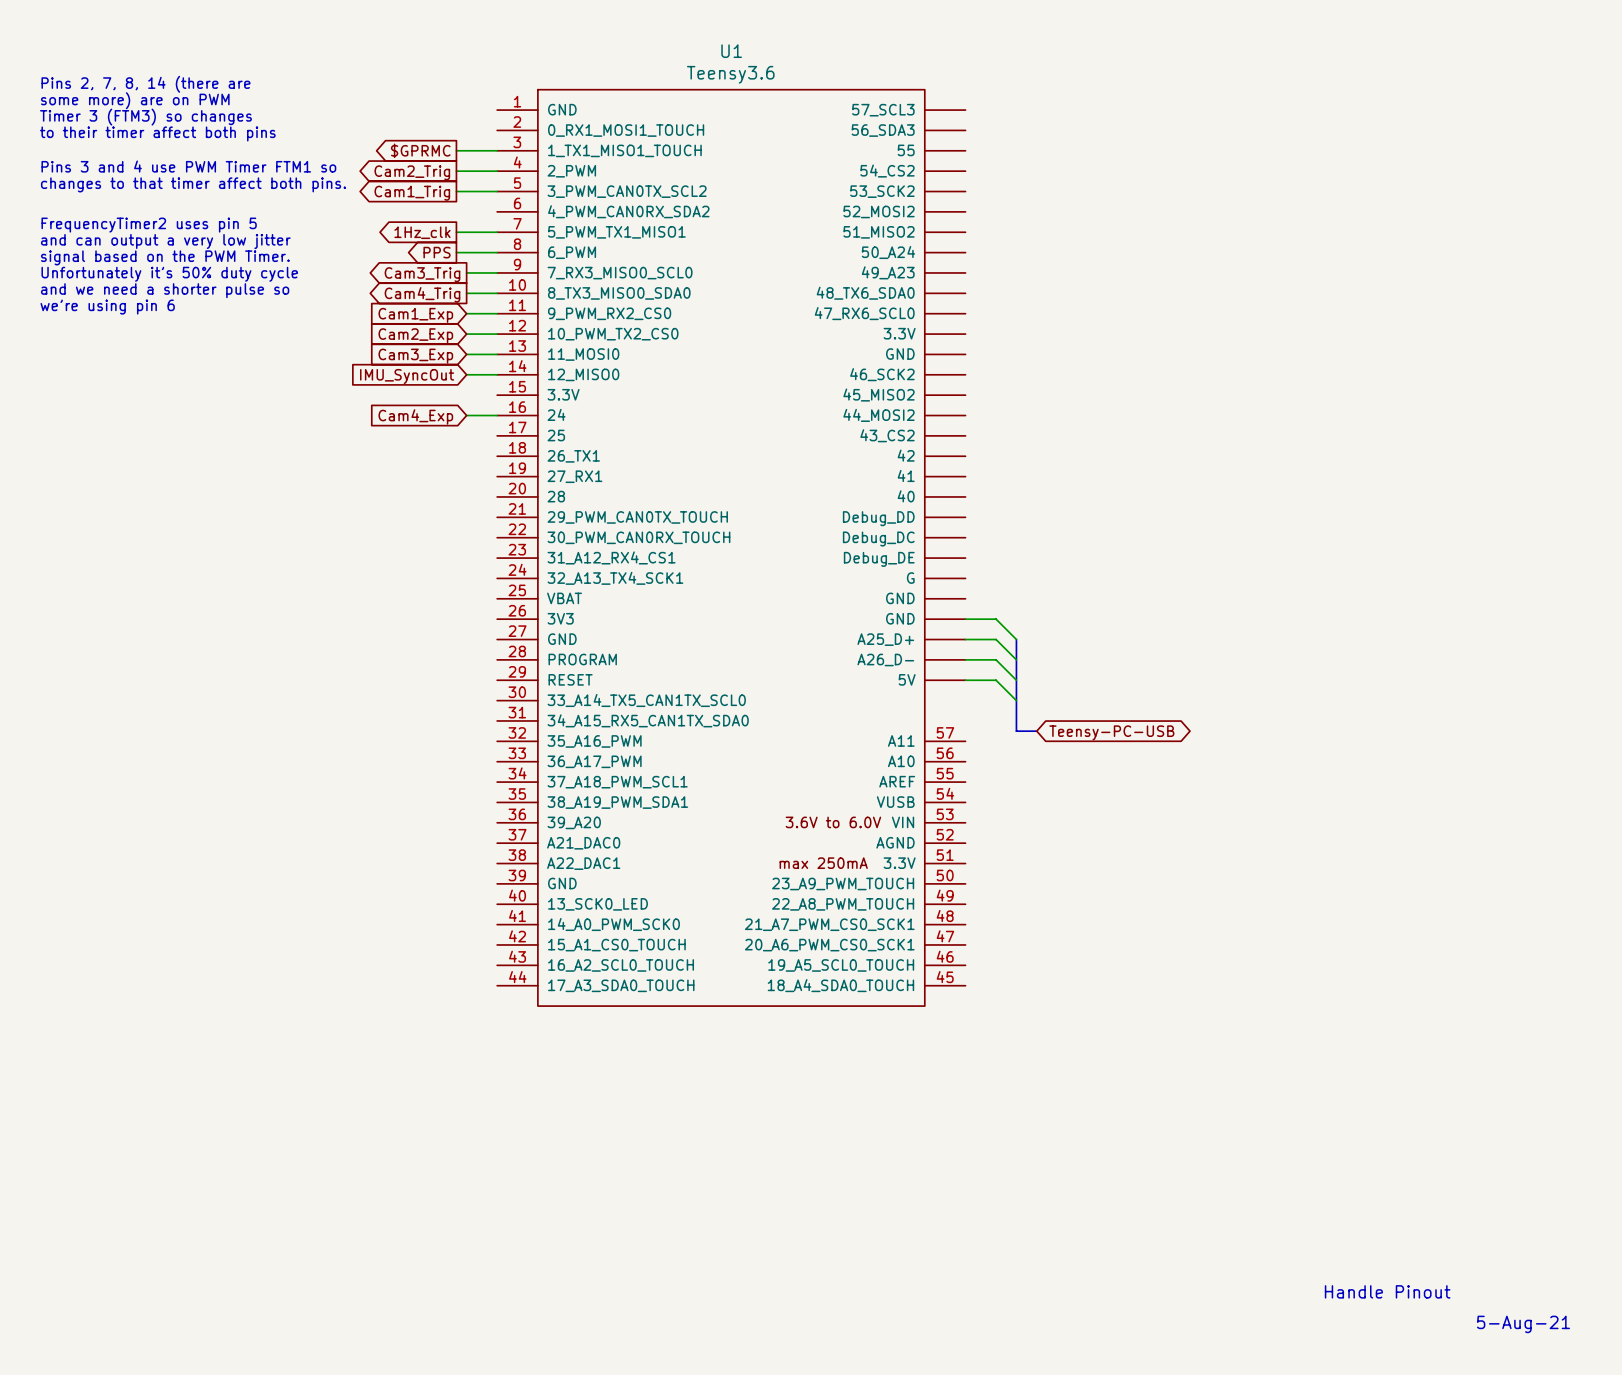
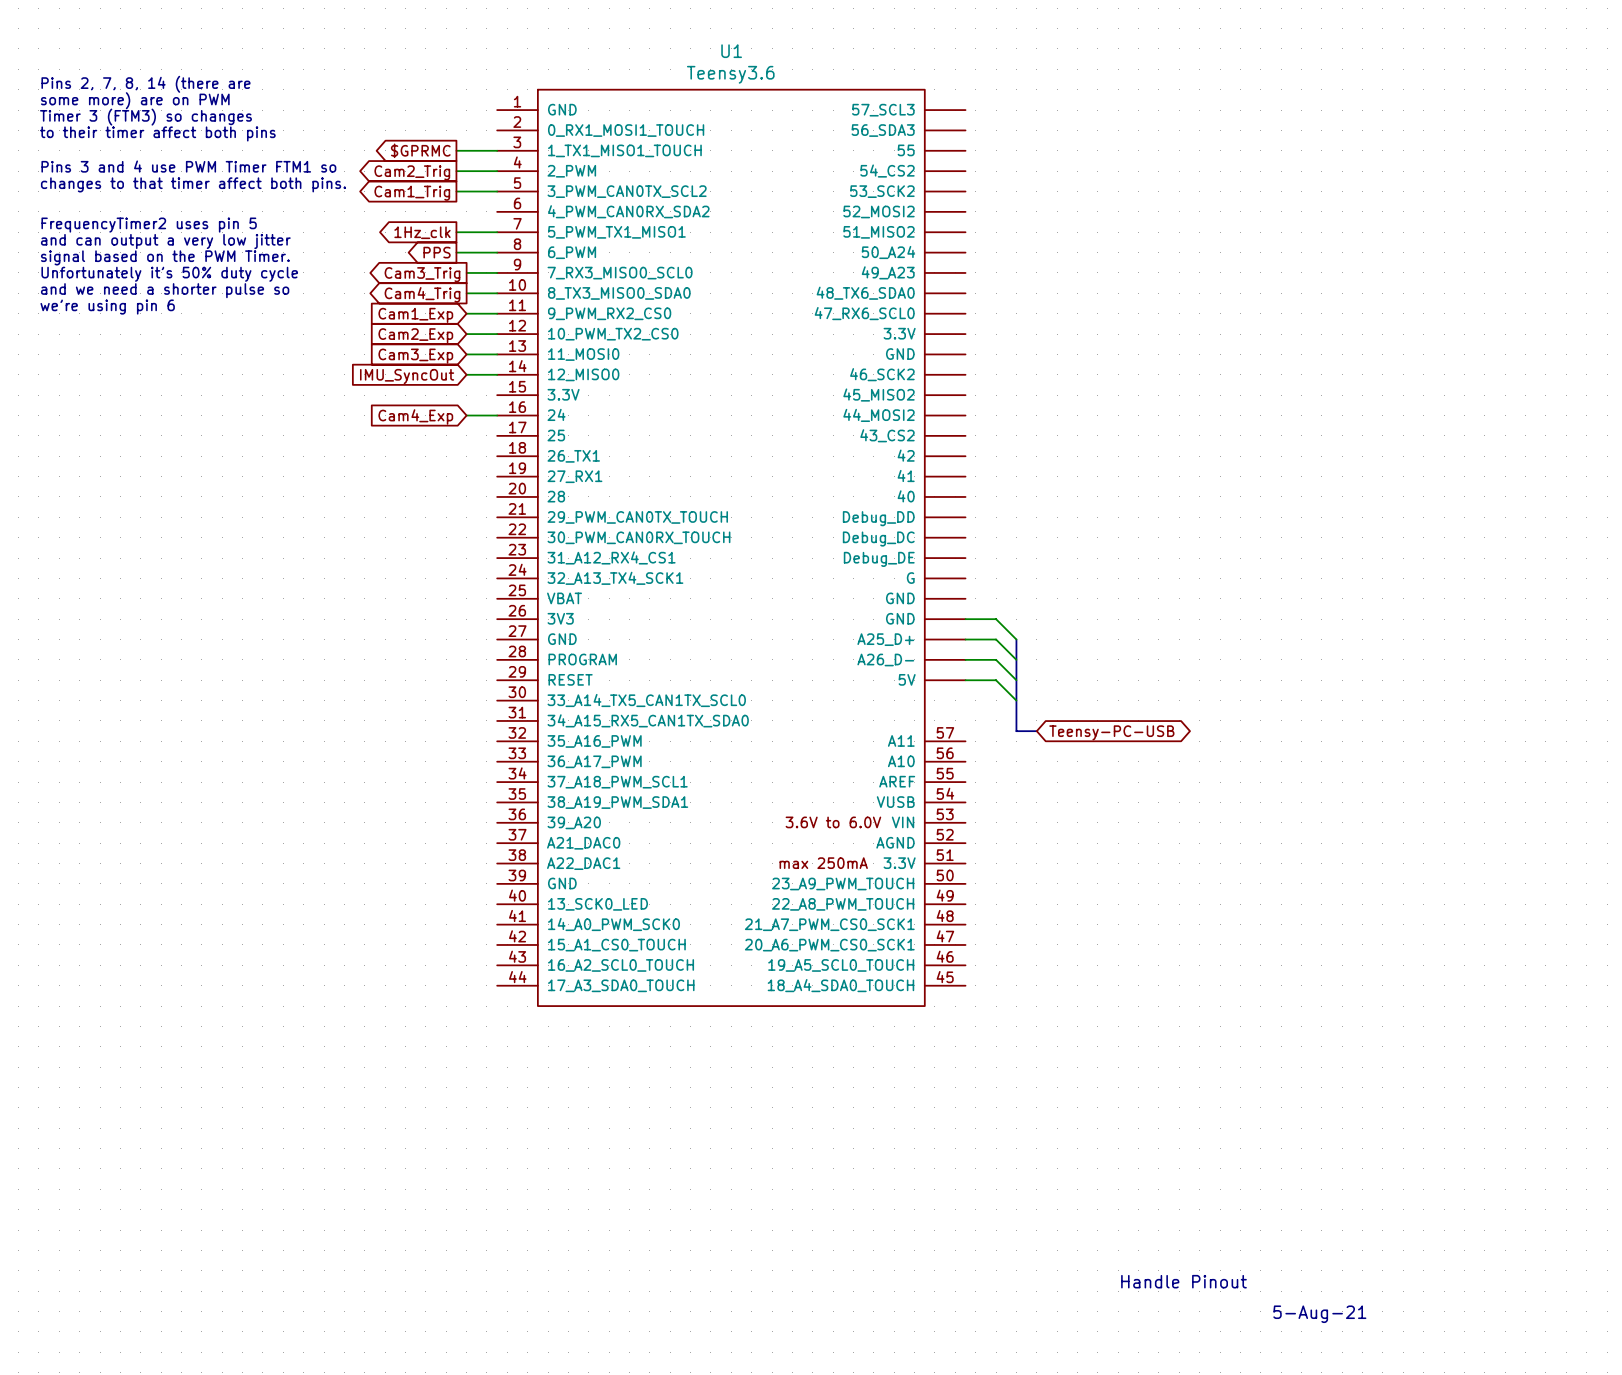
text: none -> Handle Pinout (1184, 1281)
text: Handle Pinout (1387, 1291) -> none
text: none -> 5-Aug-21 (1319, 1314)
text: 5-Aug-21 (1523, 1324) -> none

